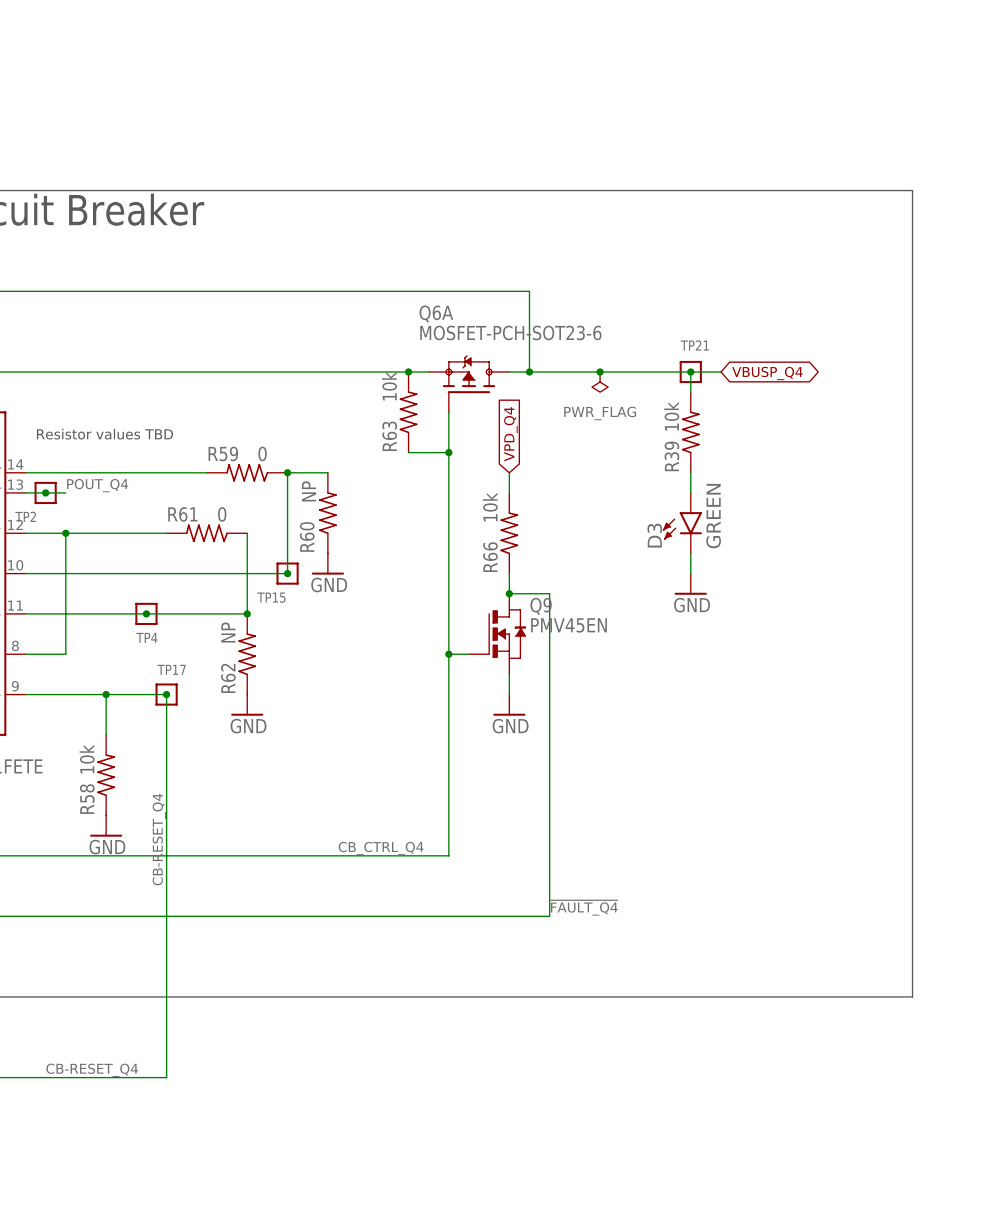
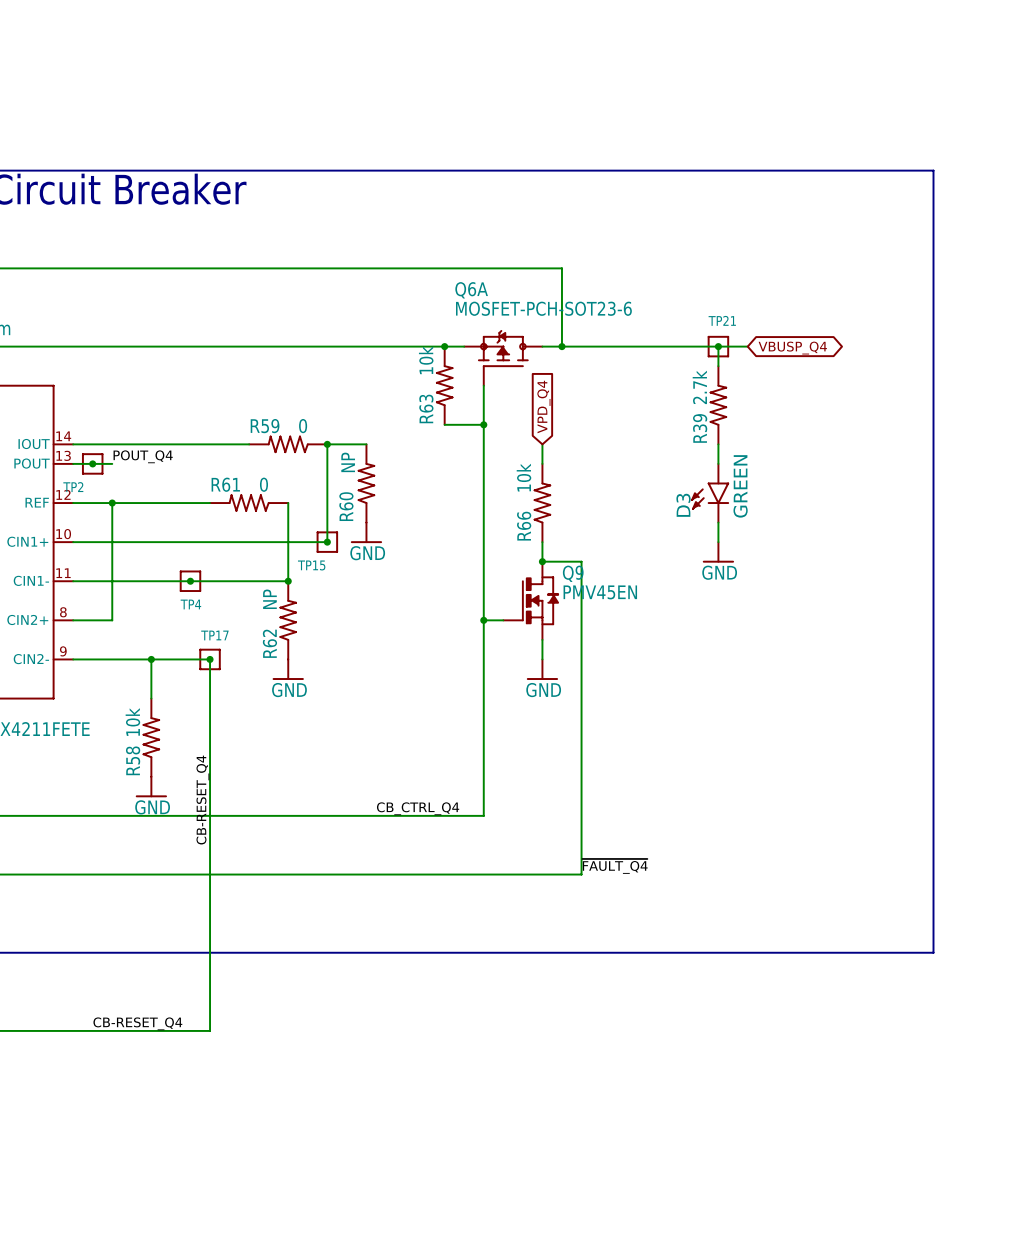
junction: (600, 371) -> none
power symbol: PWR_FLAG (600, 382) -> none
R39 value: 10k (671, 416) -> 2.7k (699, 387)
text: Resistor values TBD (104, 434) -> none

